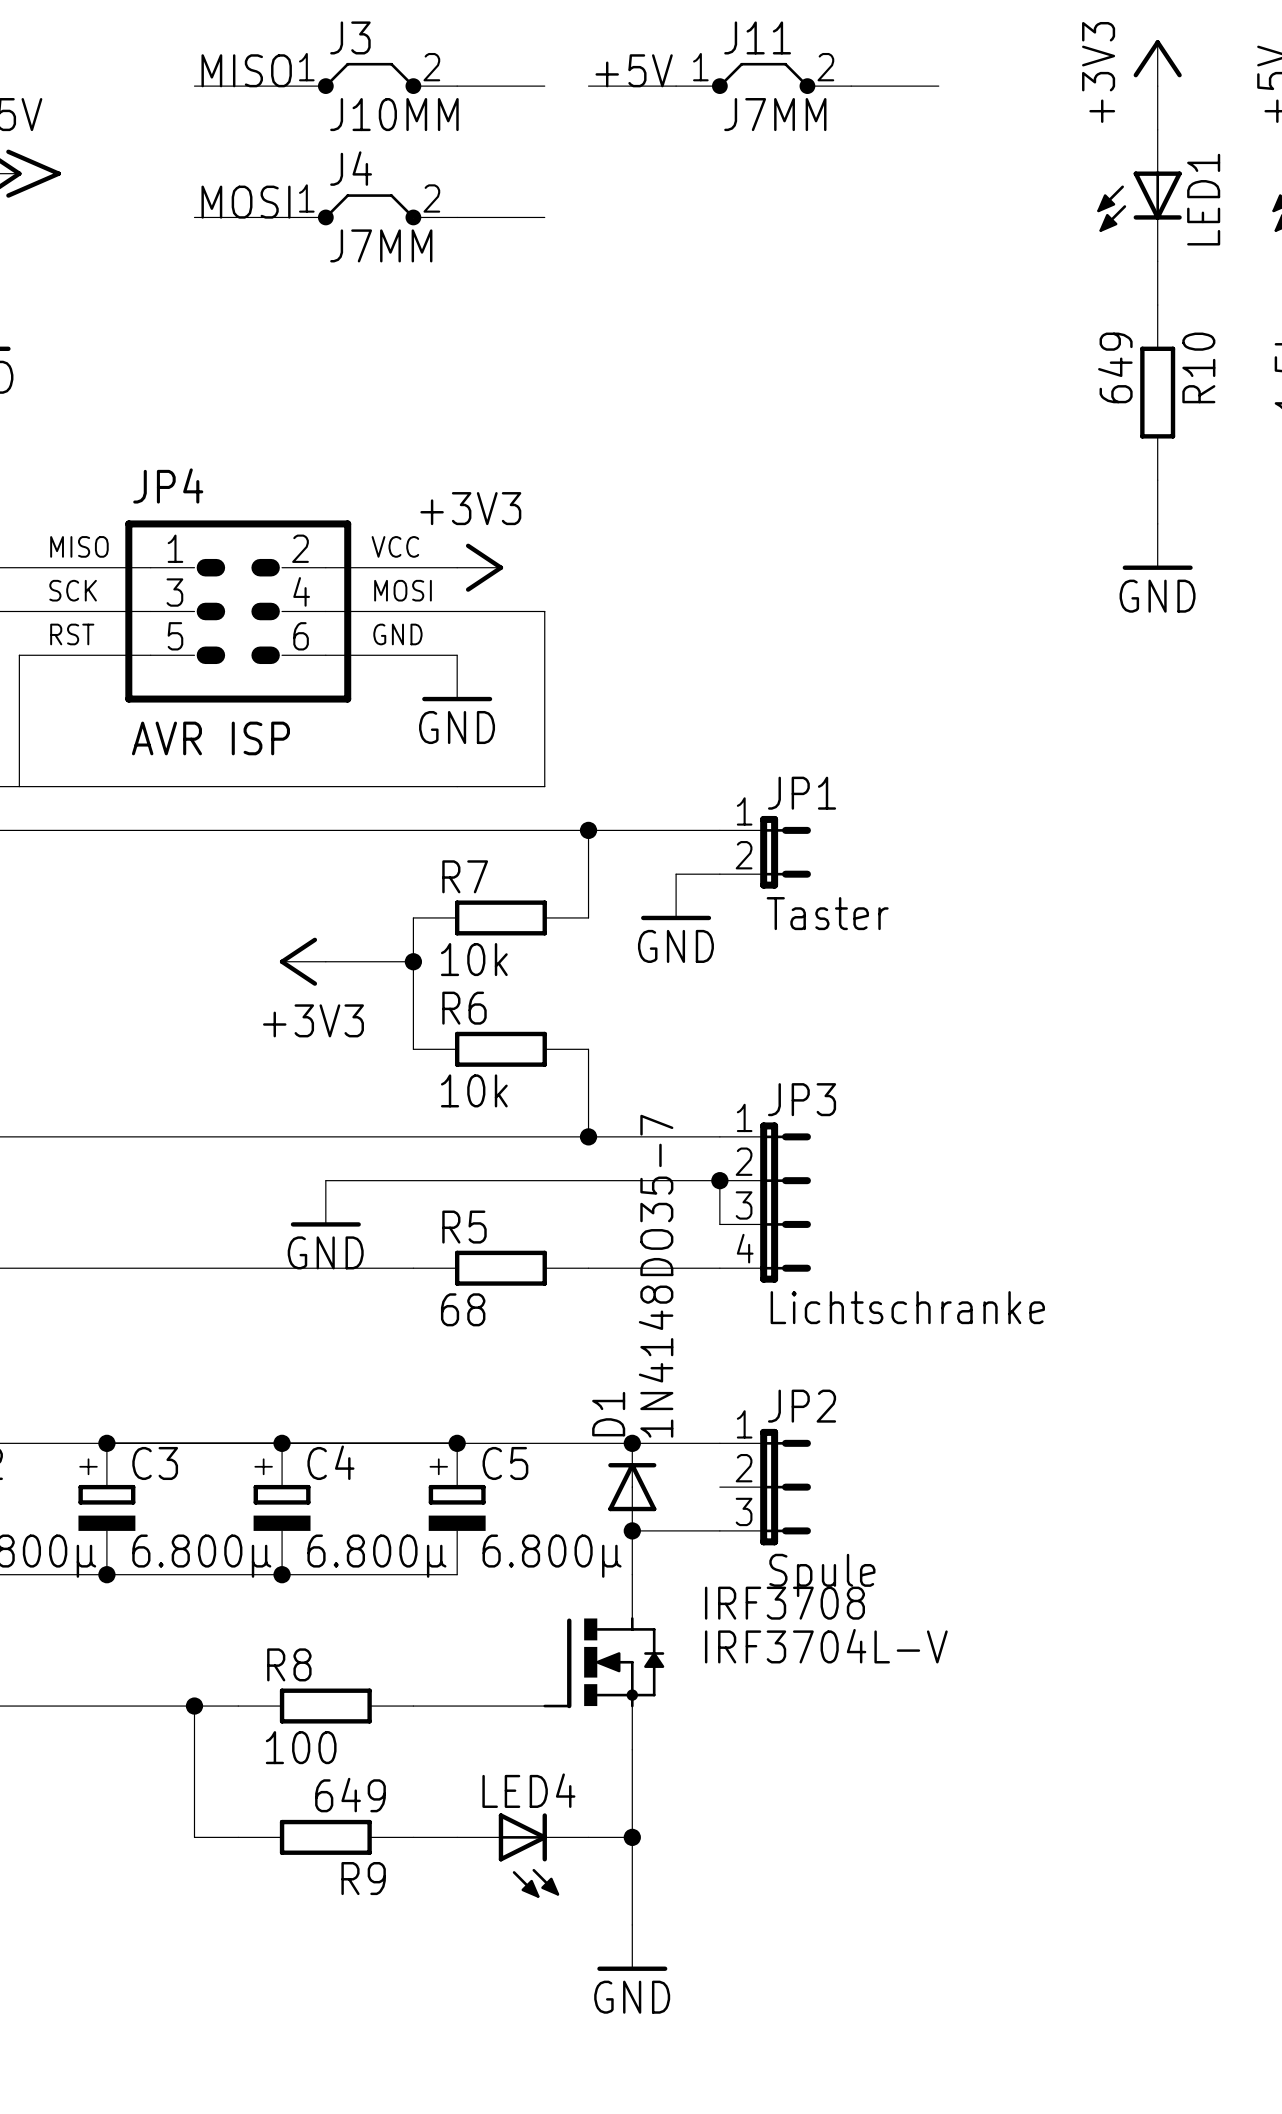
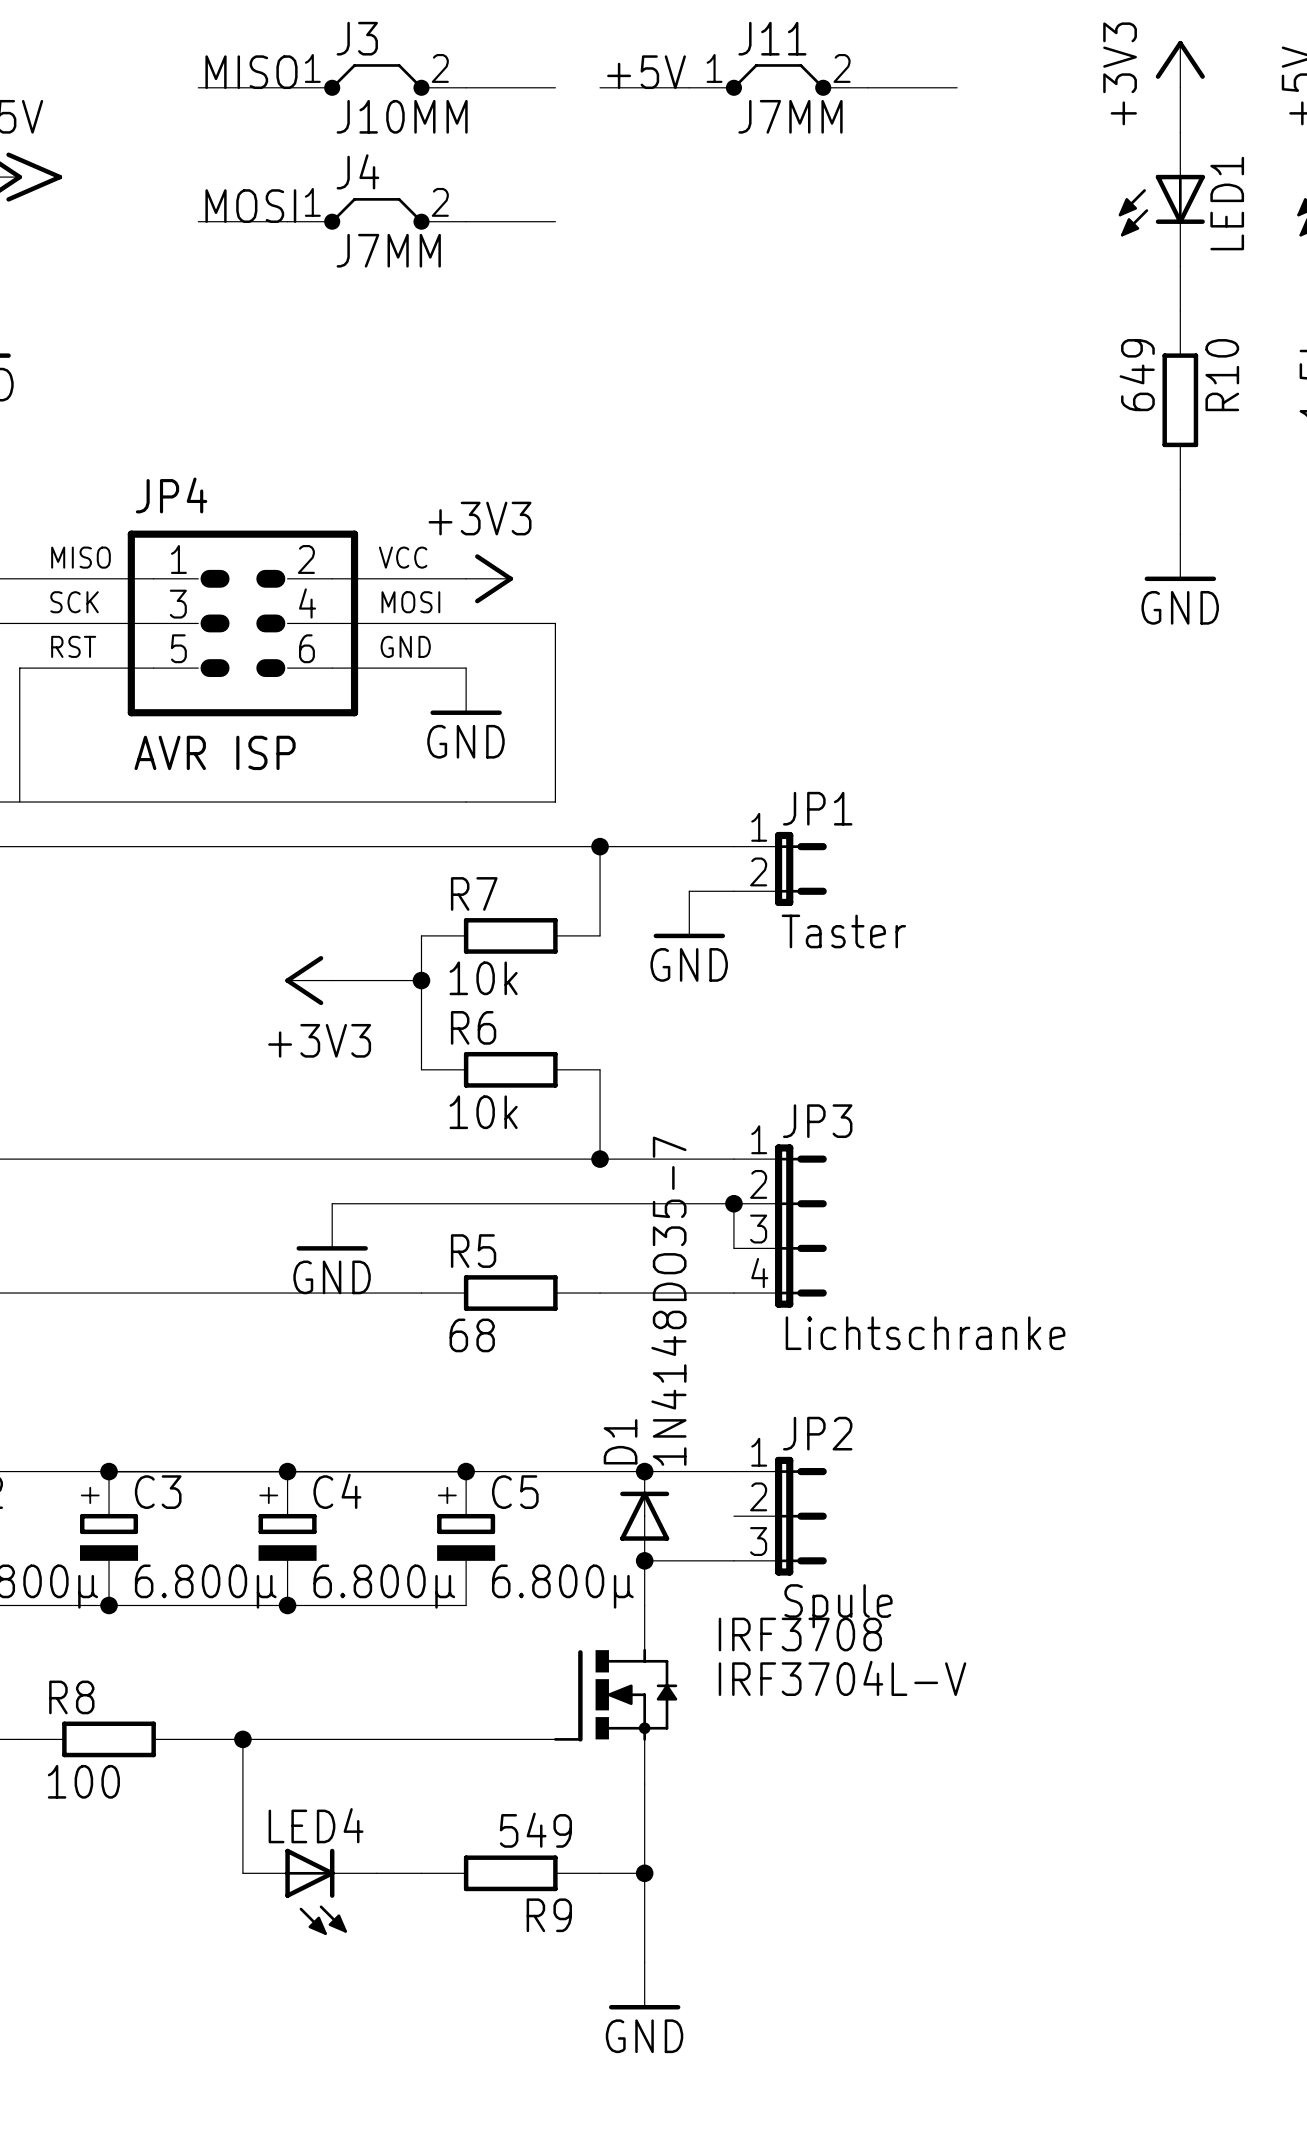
wire: (19, 1706) (194, 1706) (194, 1837) (238, 1837) -> (421, 1739) (242, 1739) (242, 1873)
junction position: (194, 1706) -> (242, 1739)
R8 position: (325, 1706) -> (109, 1739)
R9 value: 649 (350, 1795) -> 549 (535, 1830)
R9 position: (325, 1837) -> (510, 1873)
LED4 position: (522, 1855) -> (309, 1891)

